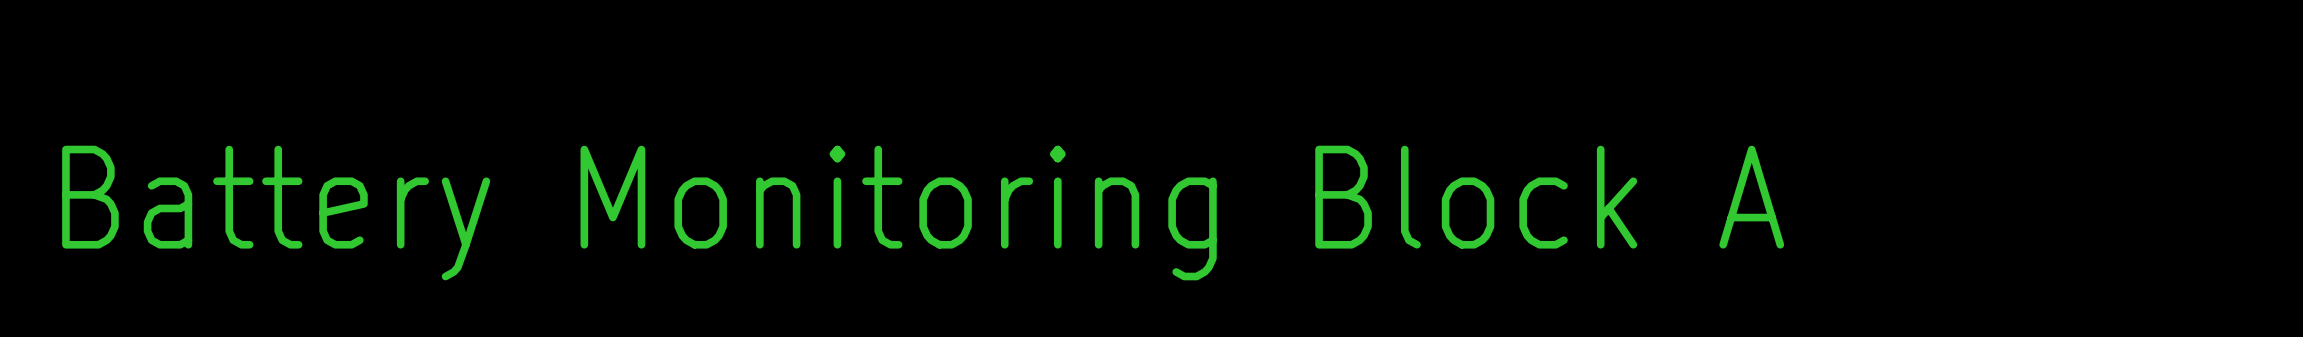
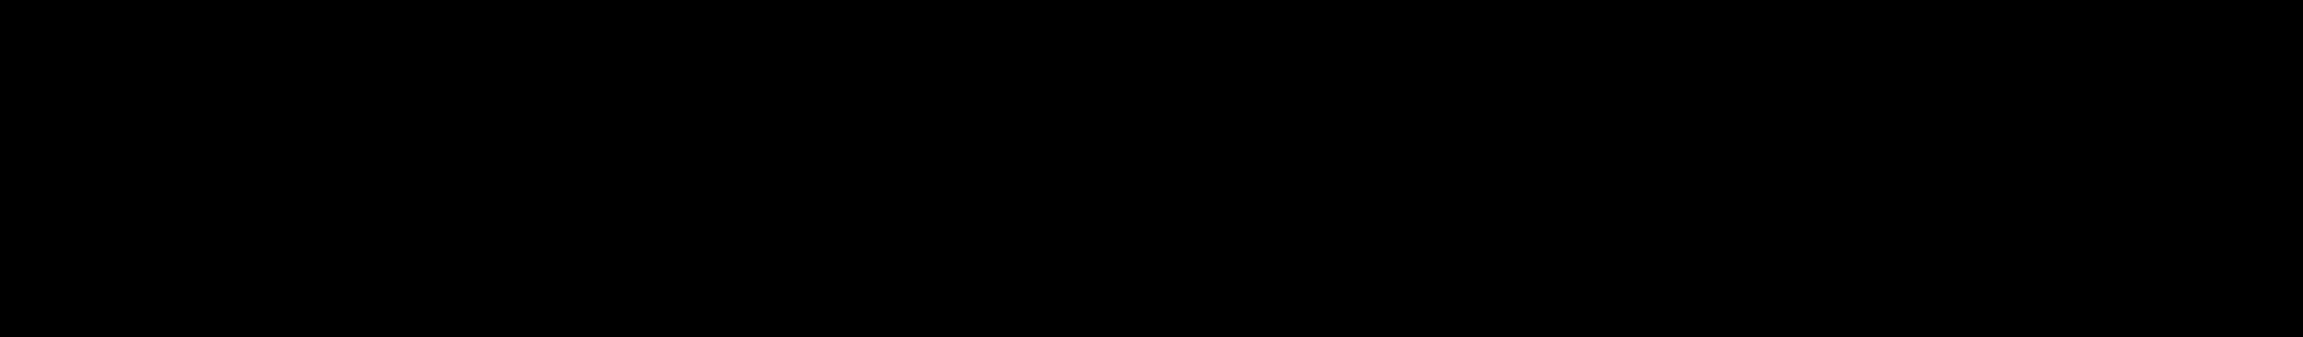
text: Battery Monitoring Block A (923, 213) -> none

